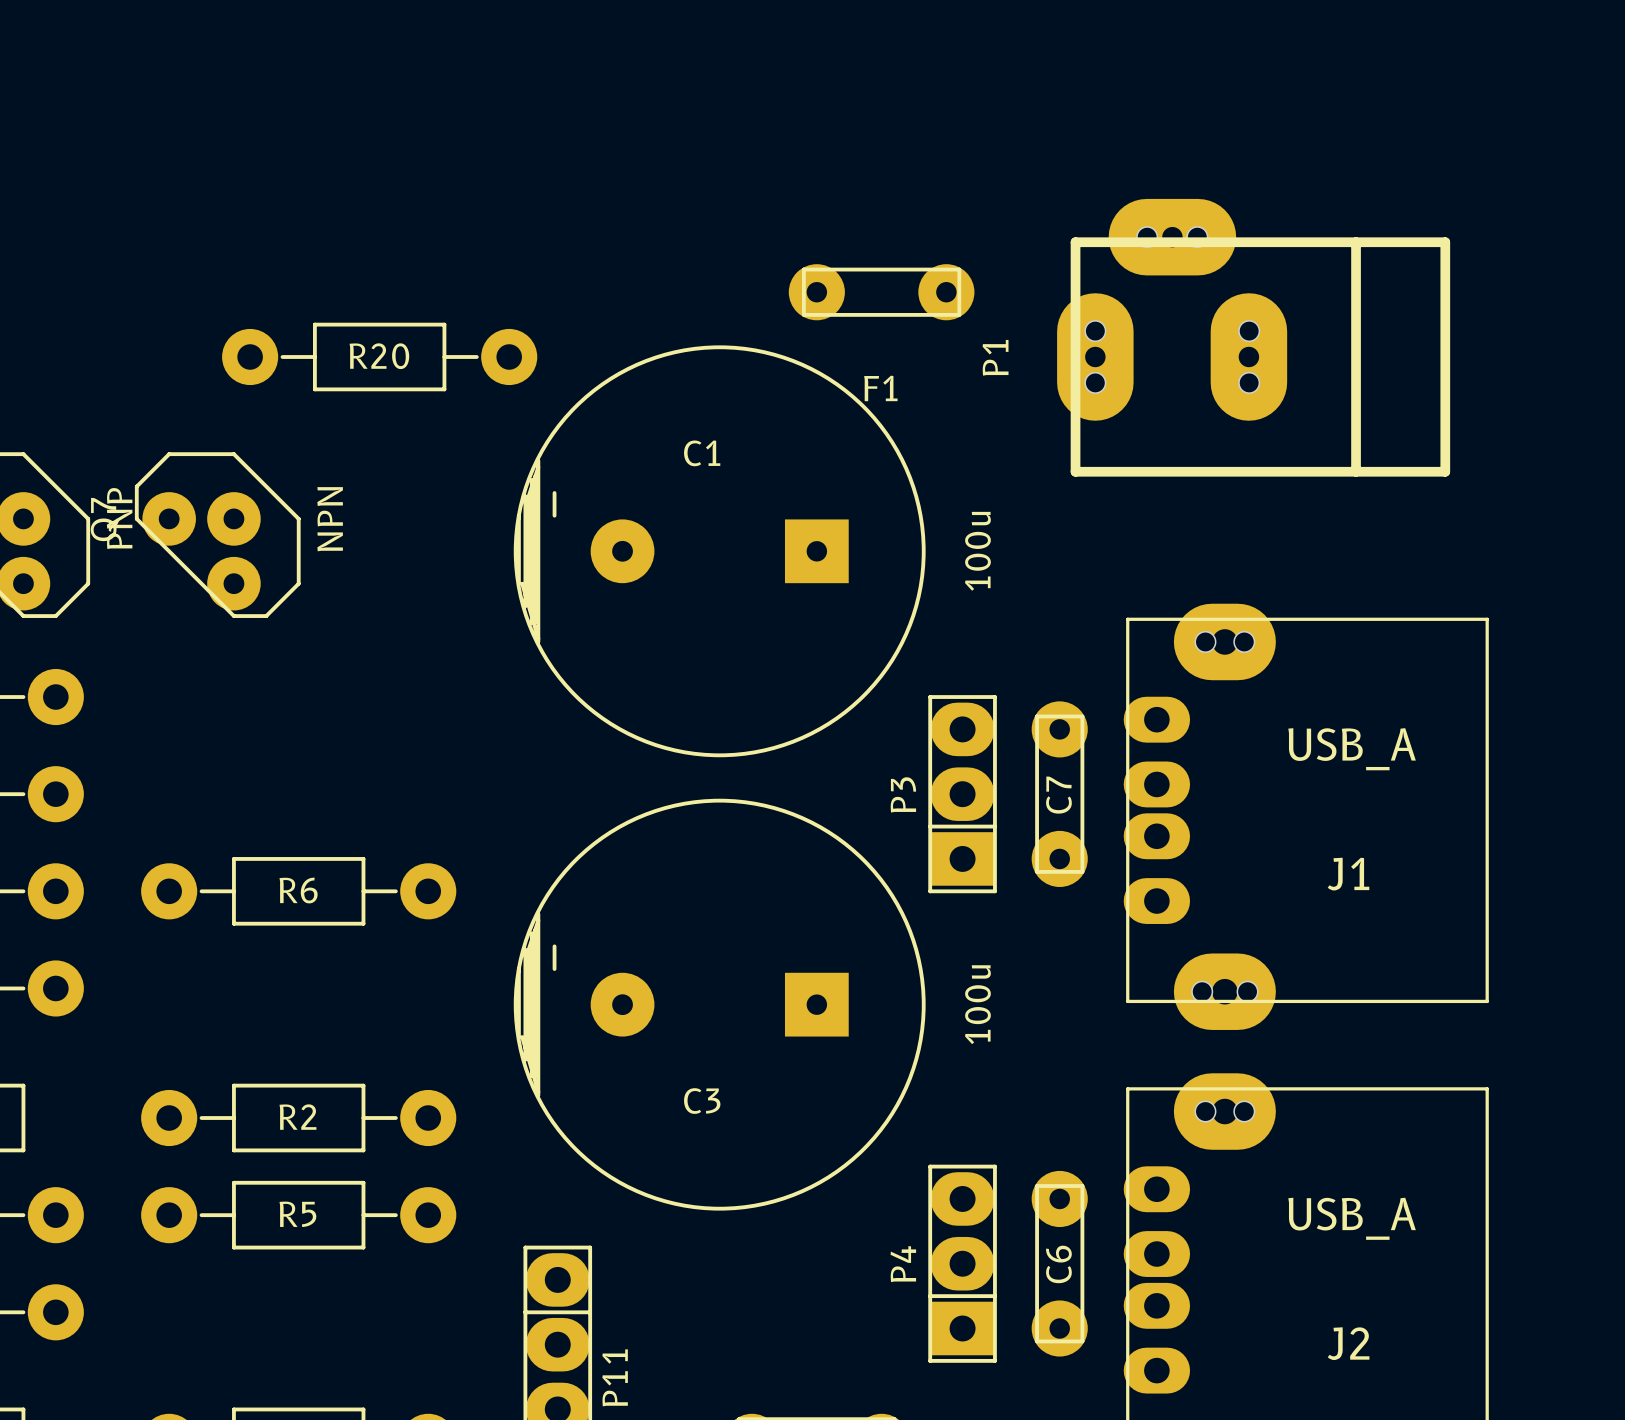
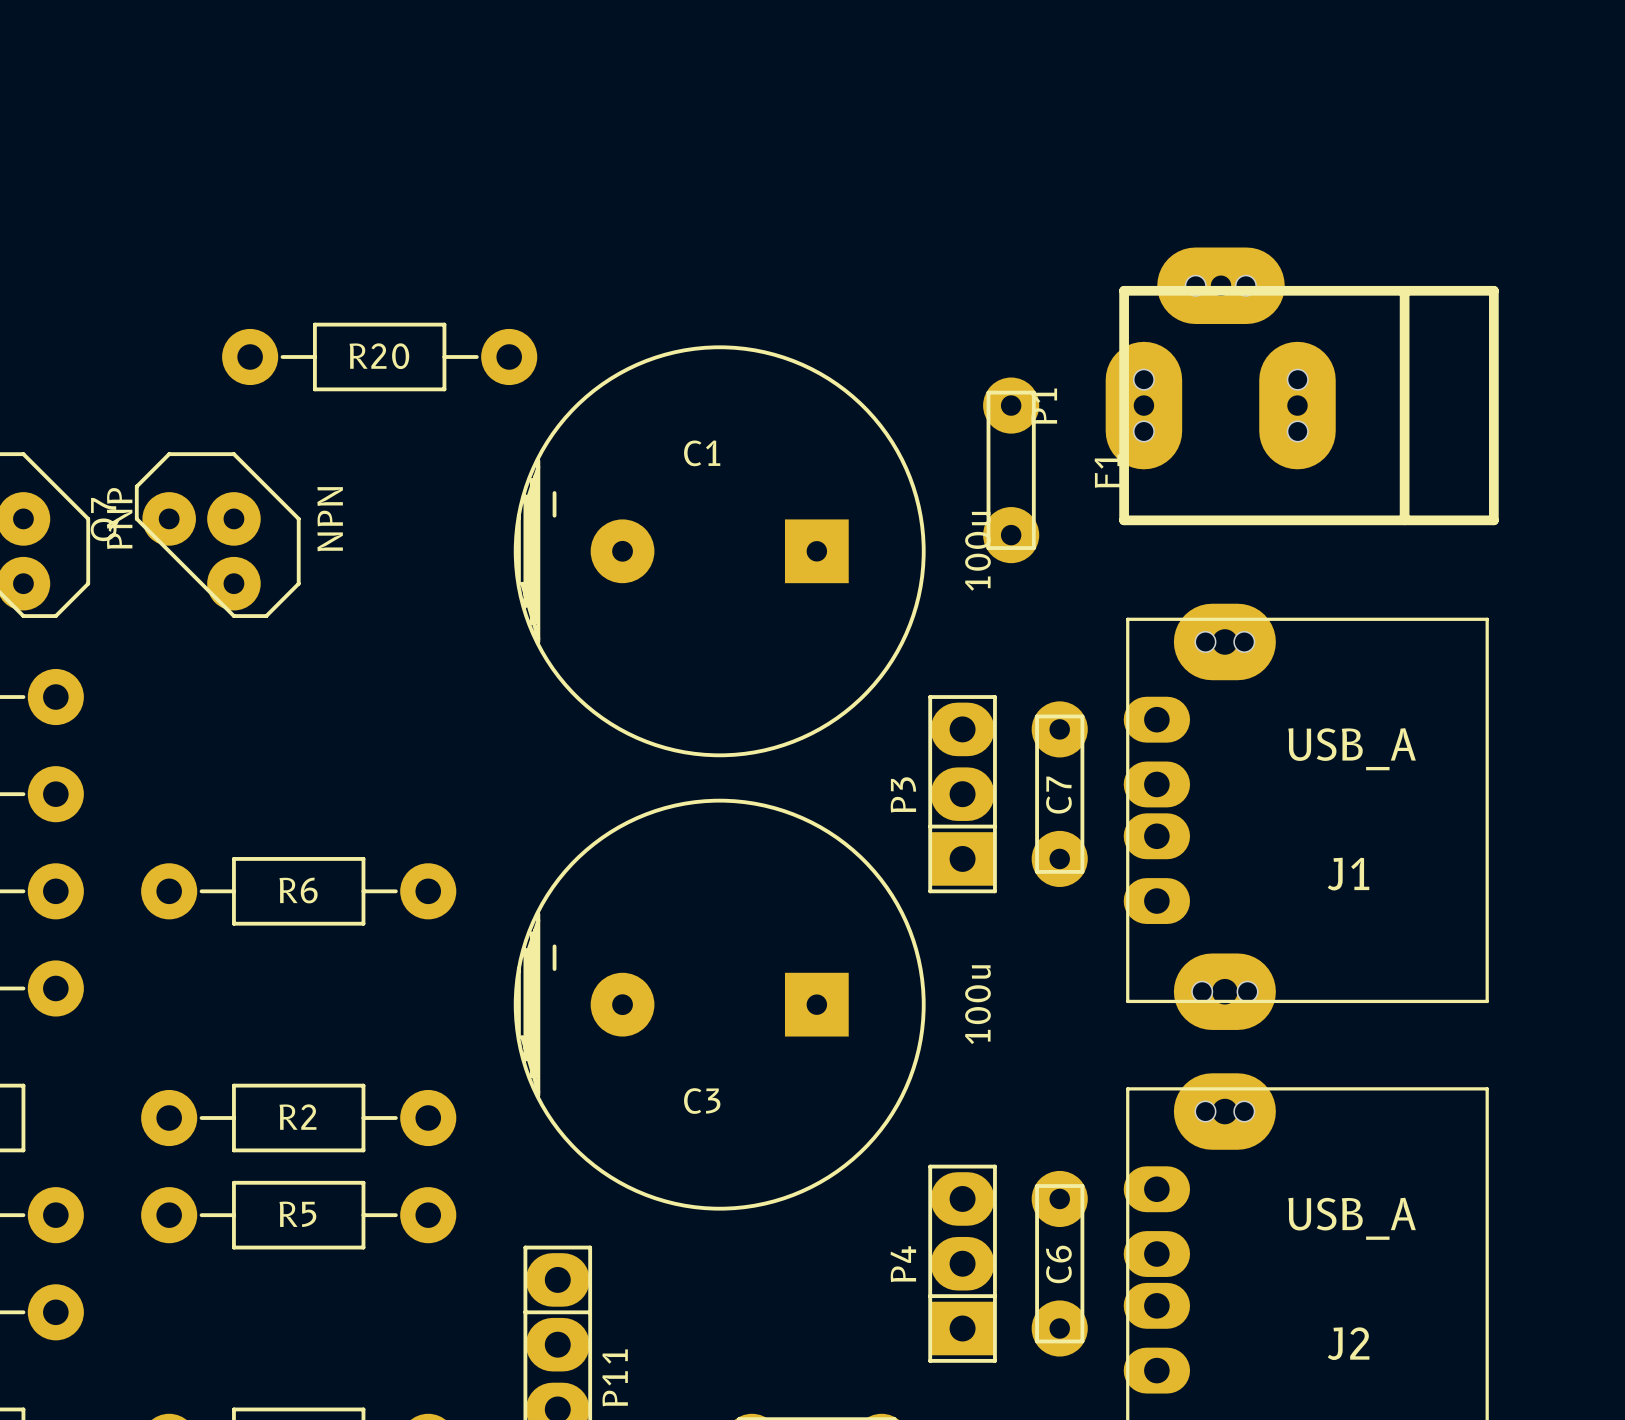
F1 rotation: 0° (881, 292) -> 90° clockwise (1011, 470)
F1 position: (881, 292) -> (1011, 470)
P1 position: (1253, 337) -> (1302, 386)
F1 name position: F1 (880, 388) -> F1 (1107, 471)

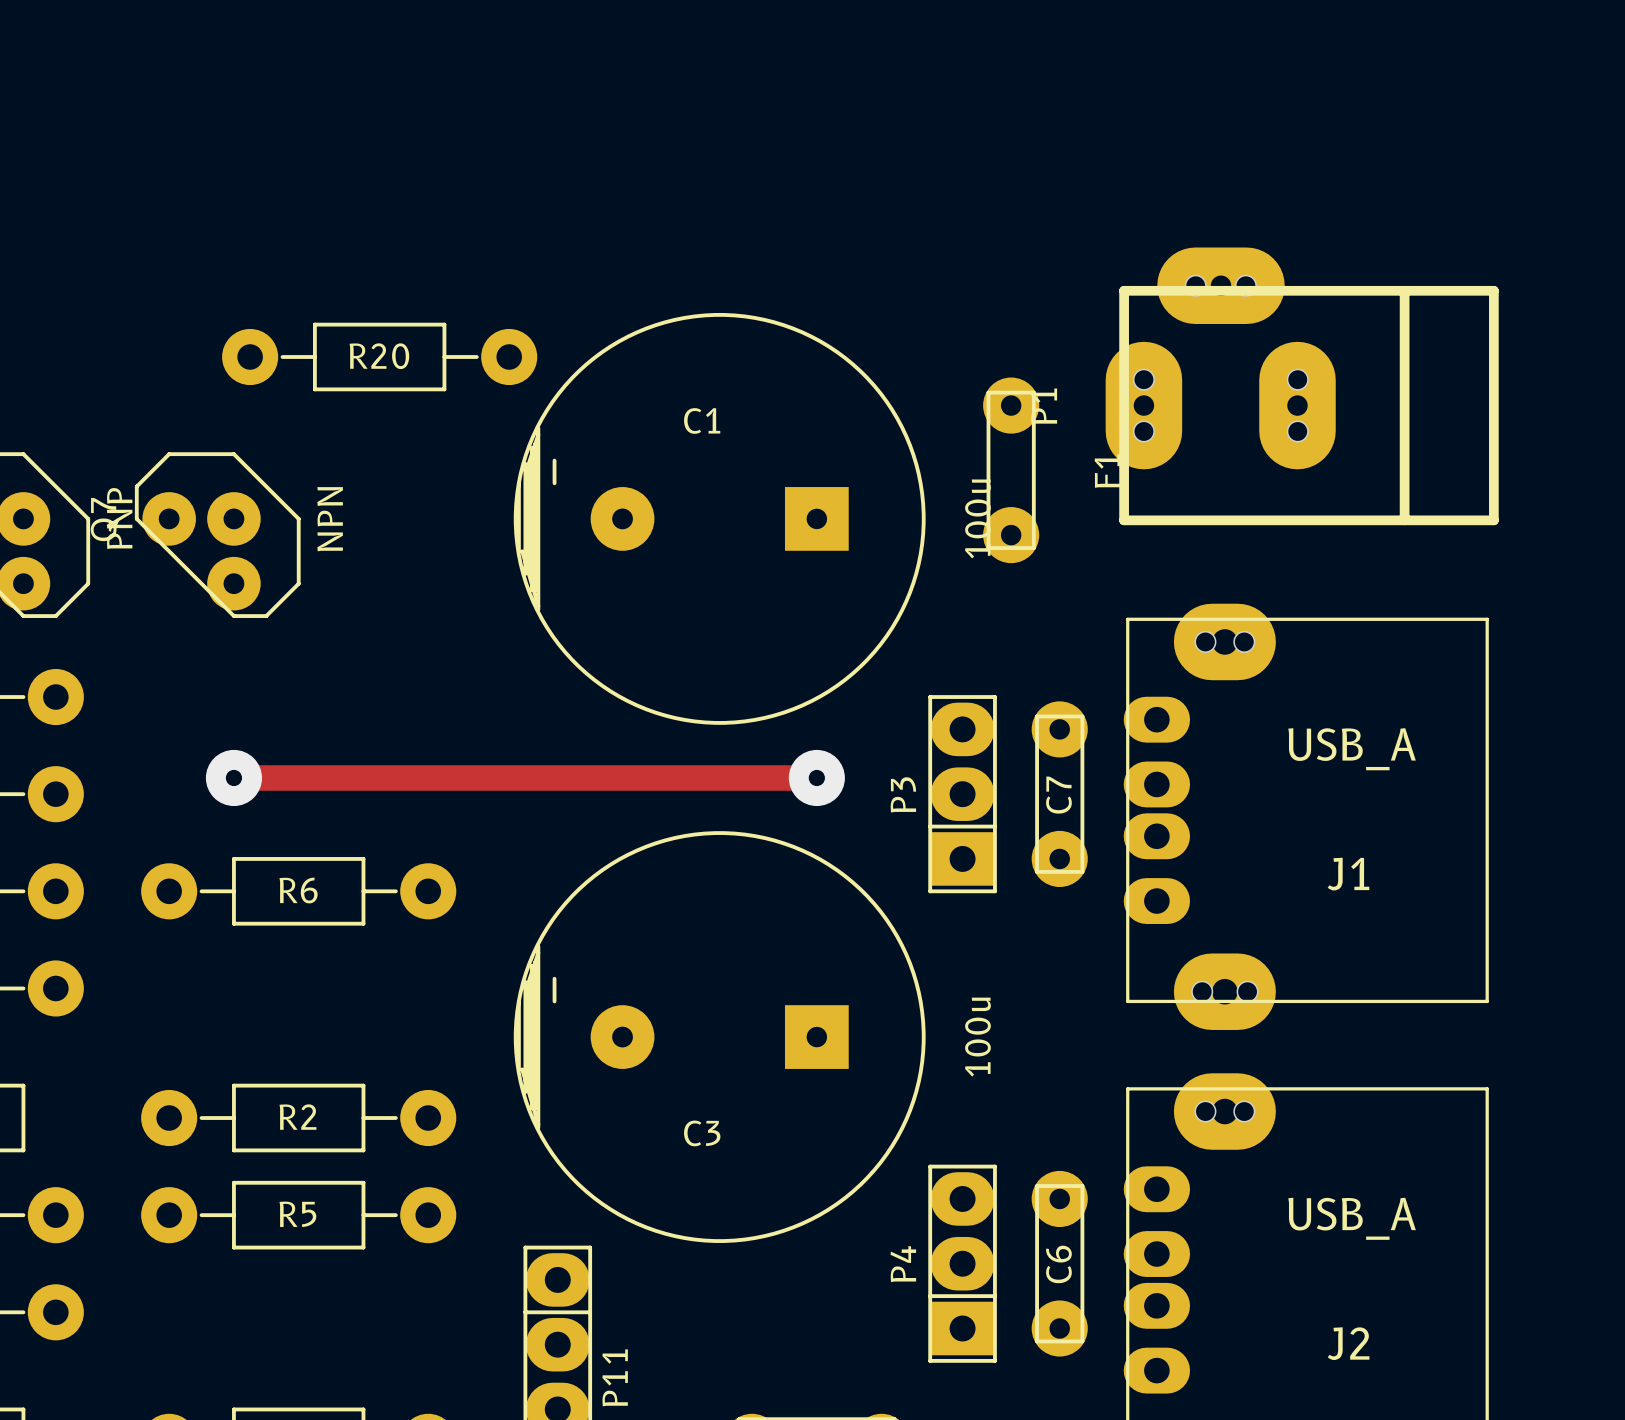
C1 position: (719, 551) -> (719, 518)
track: none -> (233, 777) (816, 777)
via: none -> (233, 777)
via: none -> (816, 777)
C3 position: (719, 1004) -> (719, 1037)

